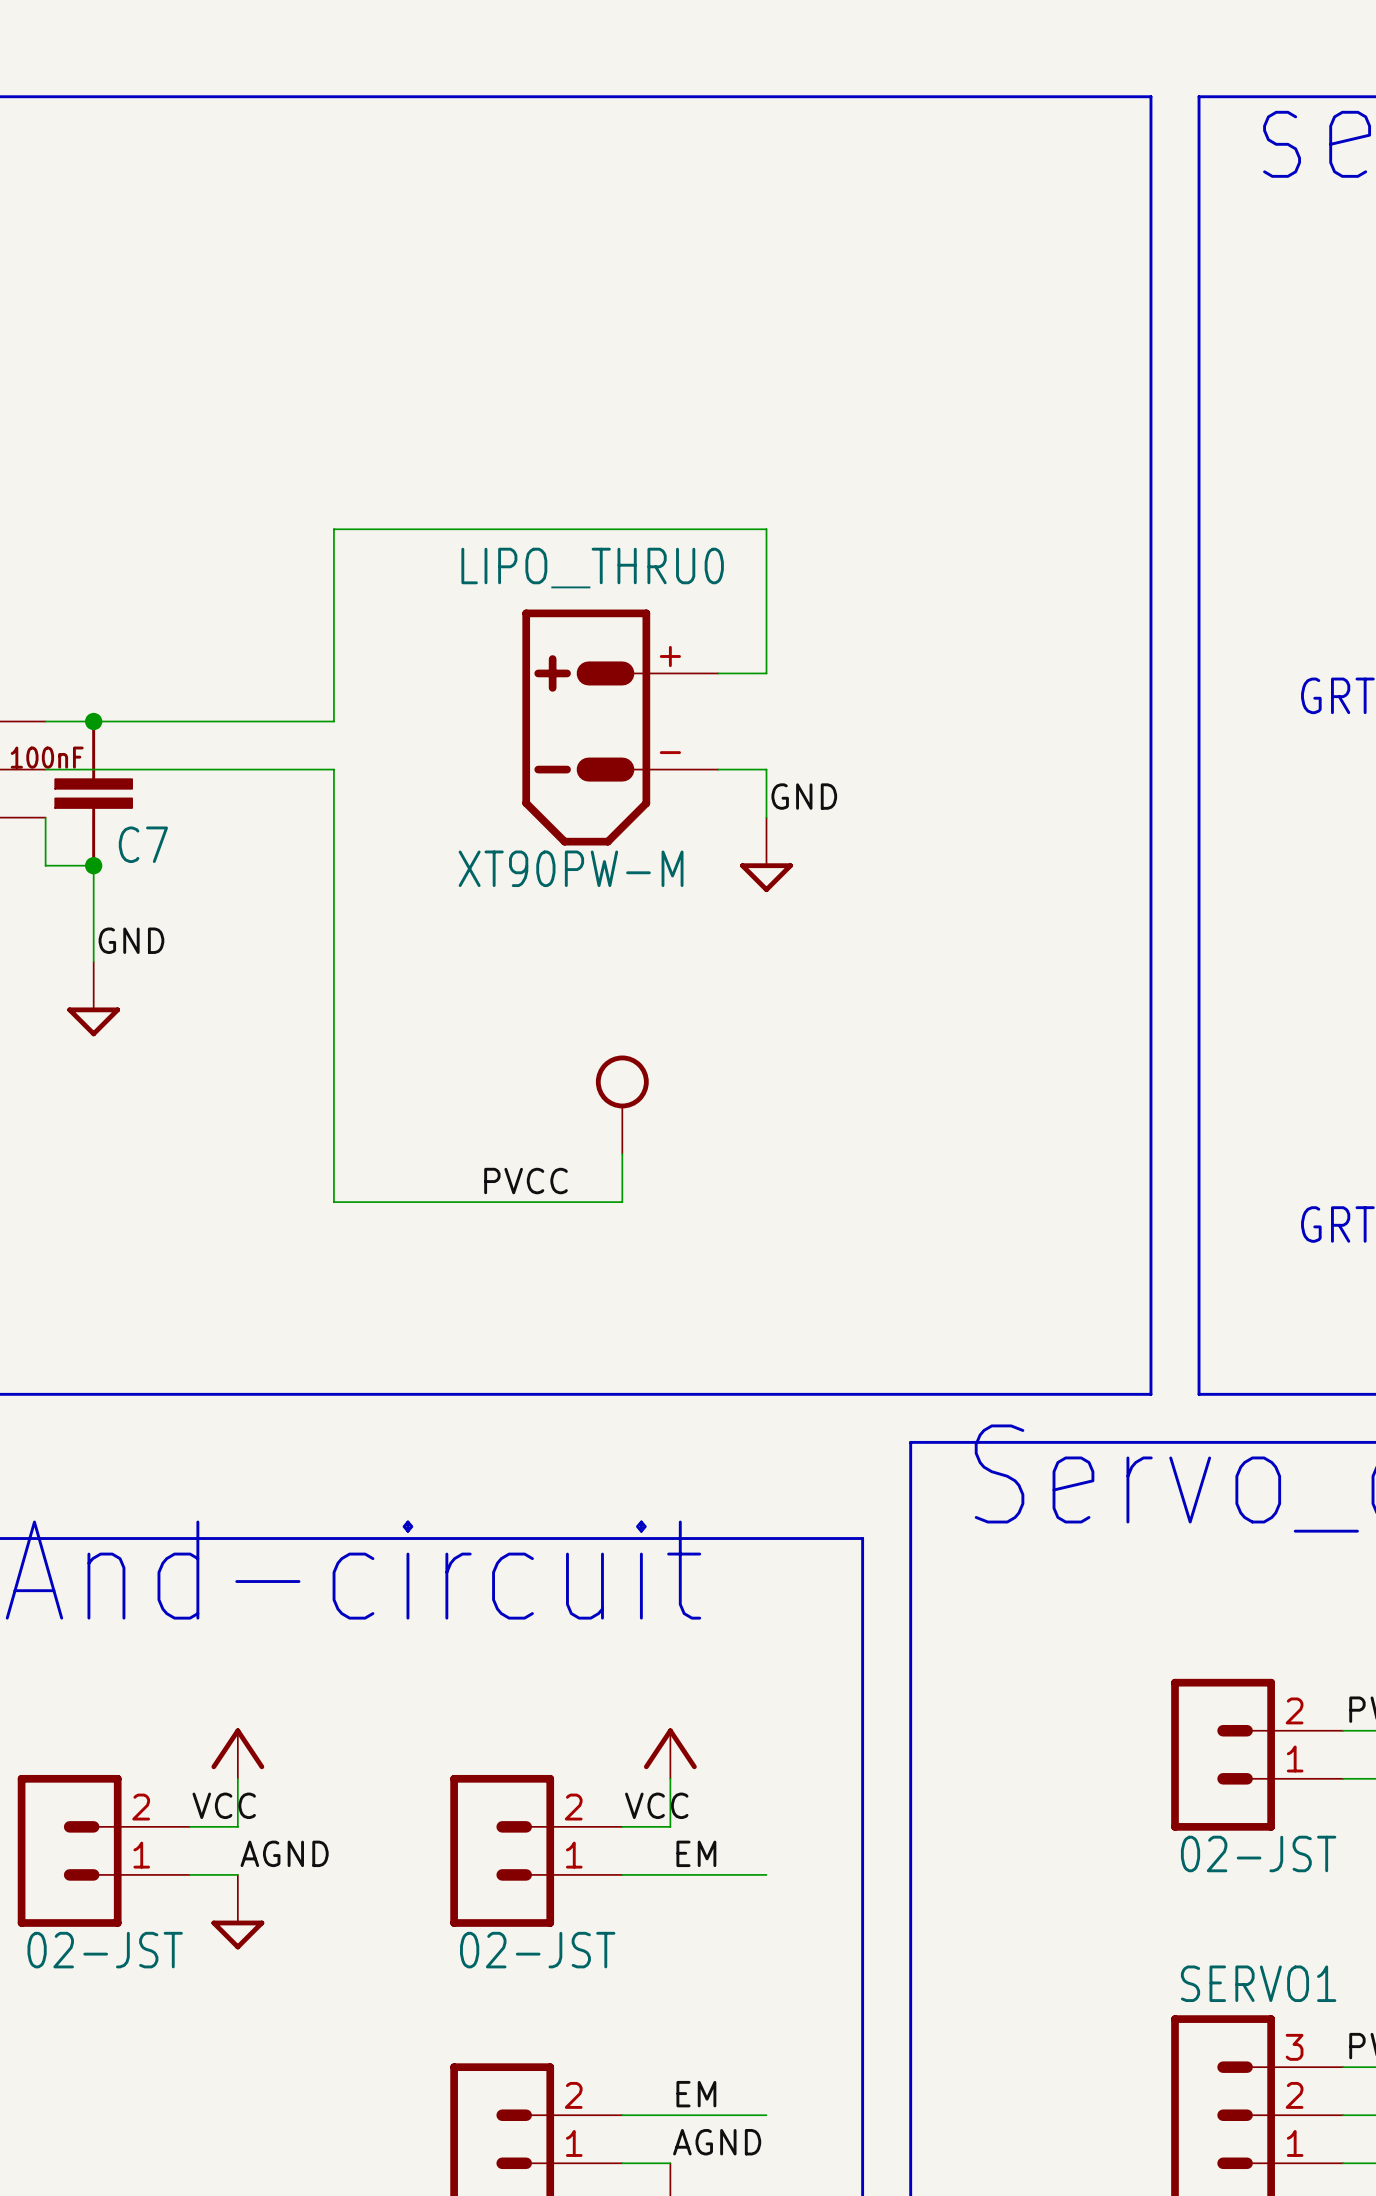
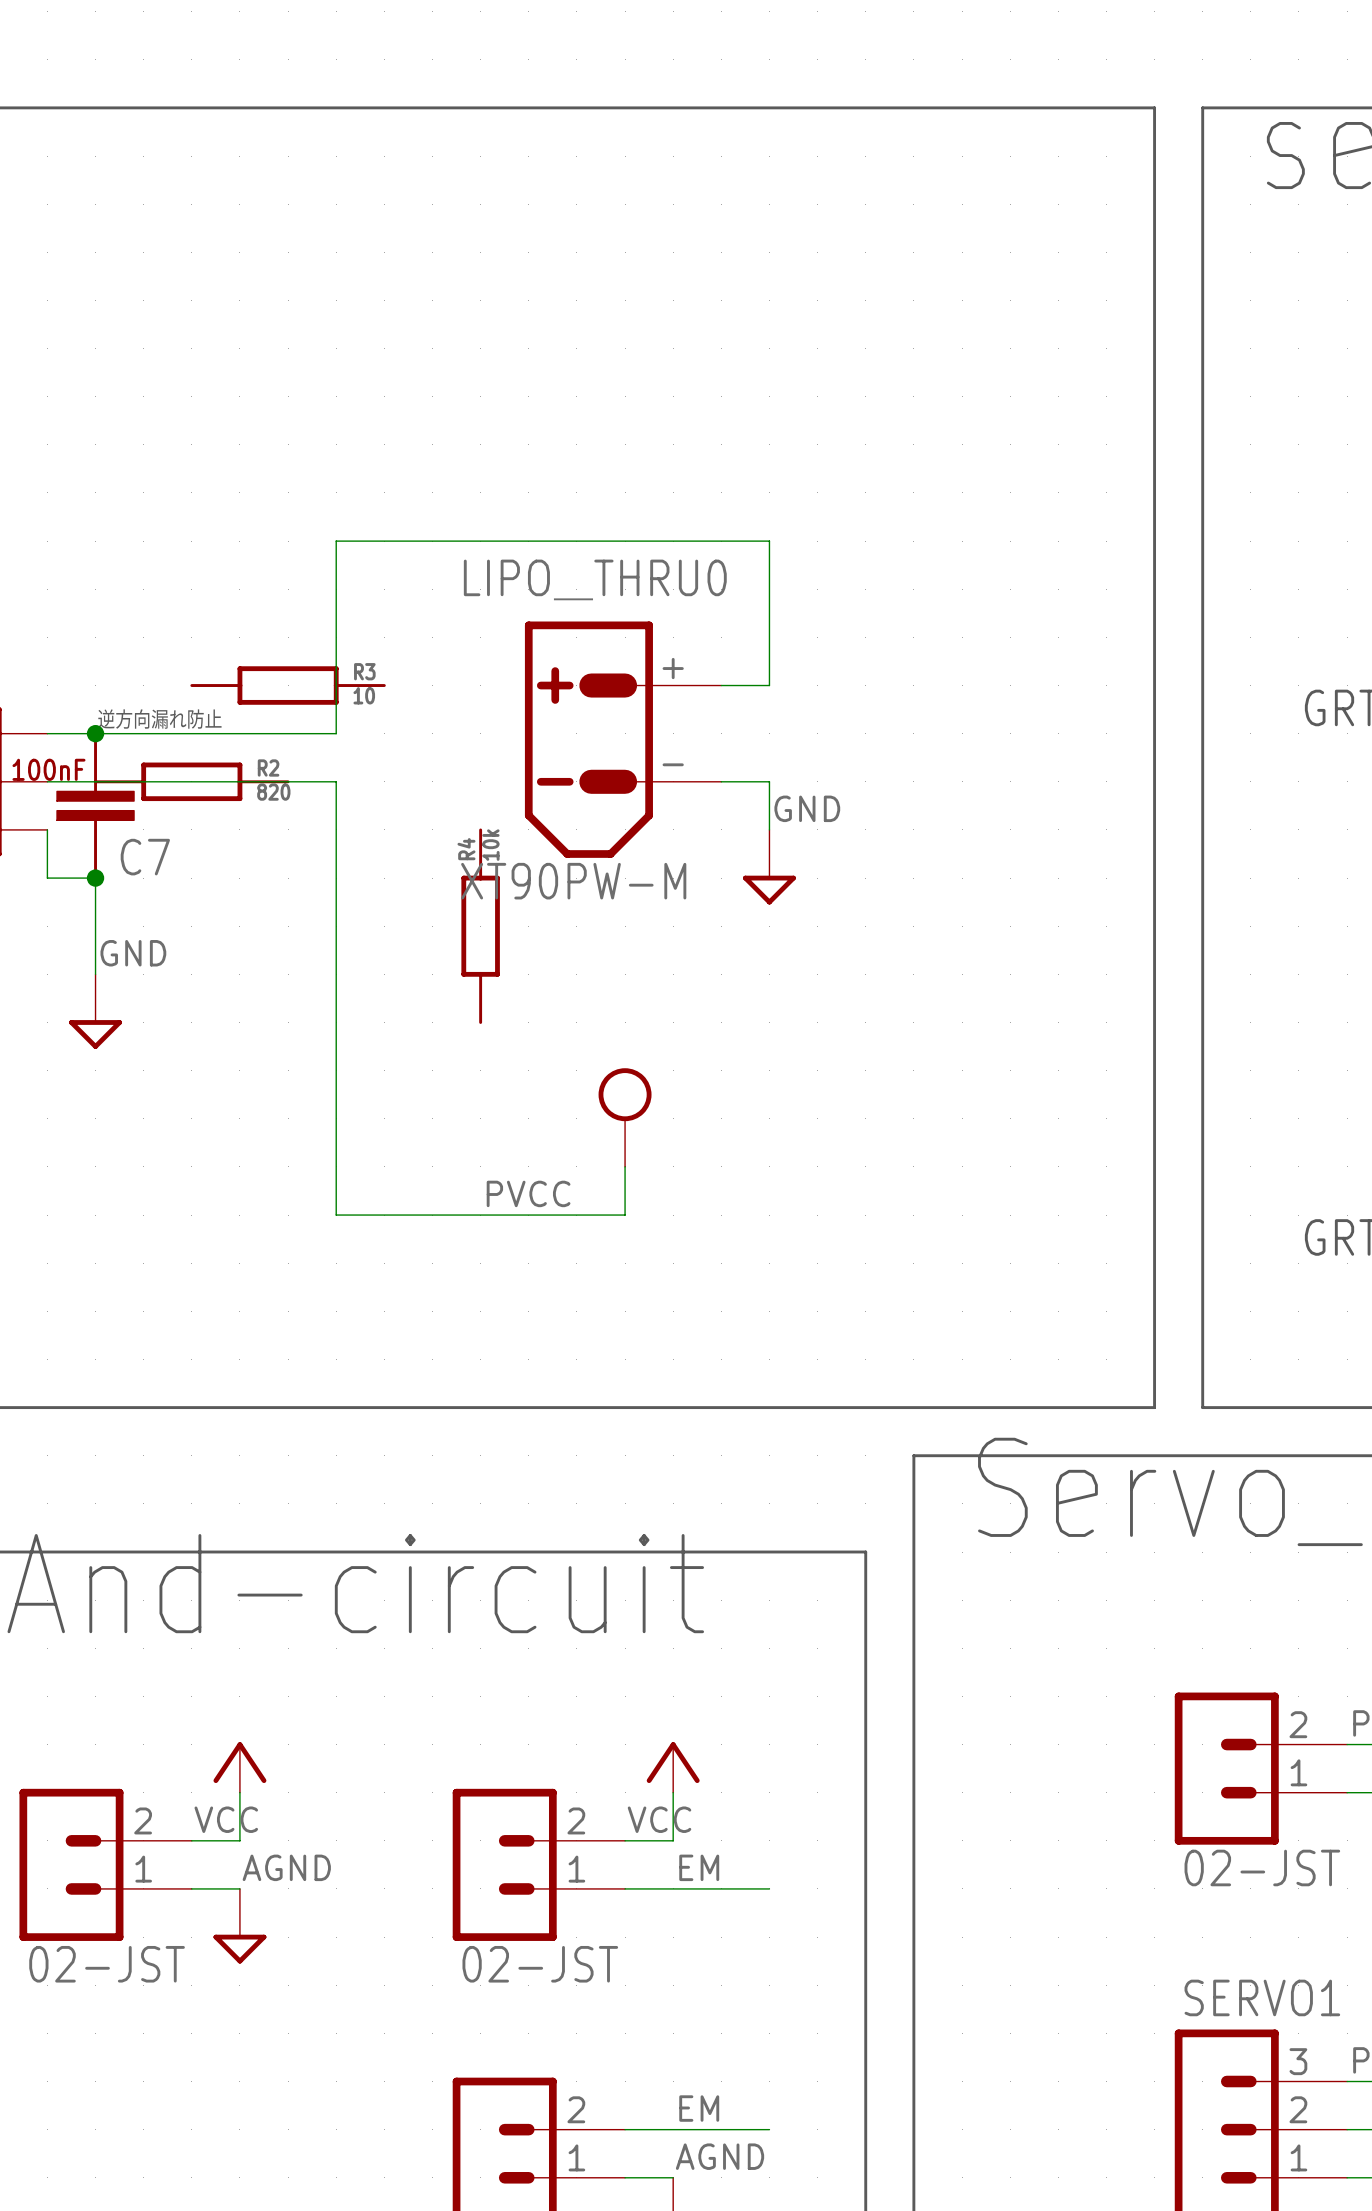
R3: none -> 10 (288, 685)
text: none -> 逆方向漏れ防止 (159, 719)
R2: none -> 820 (191, 781)
R4: none -> 10k (480, 926)

